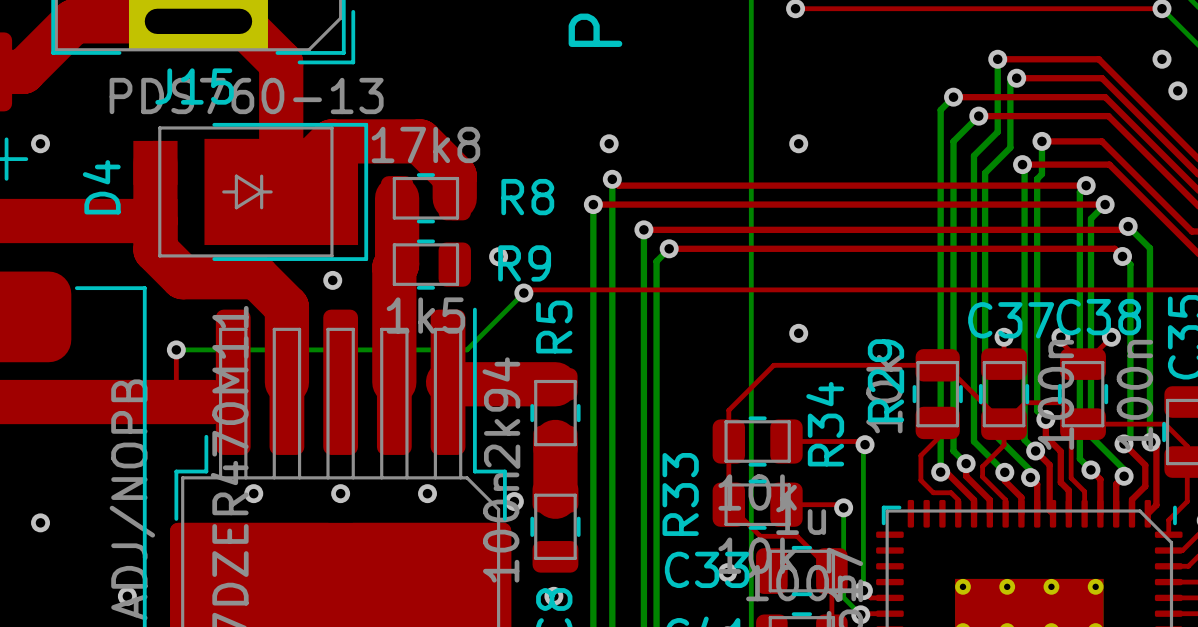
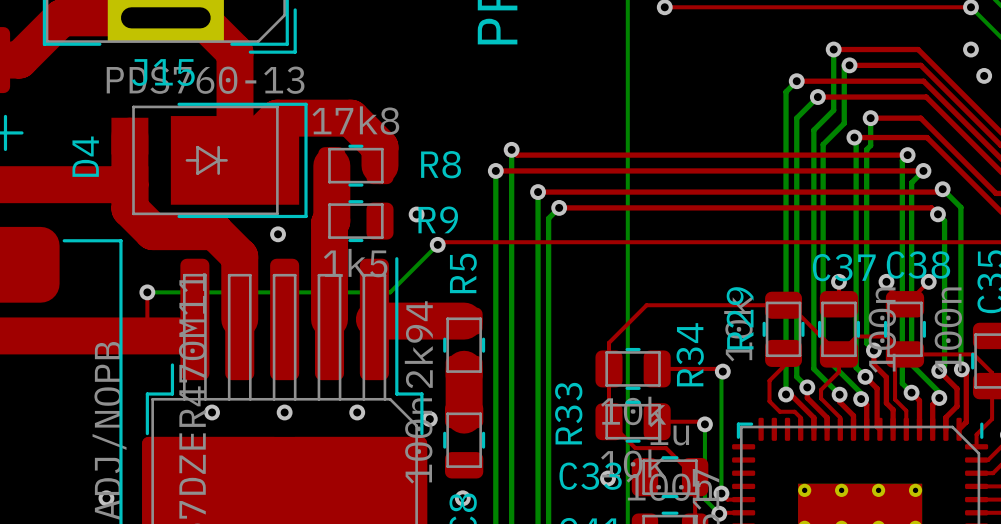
via: (40, 143) -> none
via: (609, 143) -> none
via: (798, 143) -> none
via: (798, 333) -> none
via: (40, 522) -> none

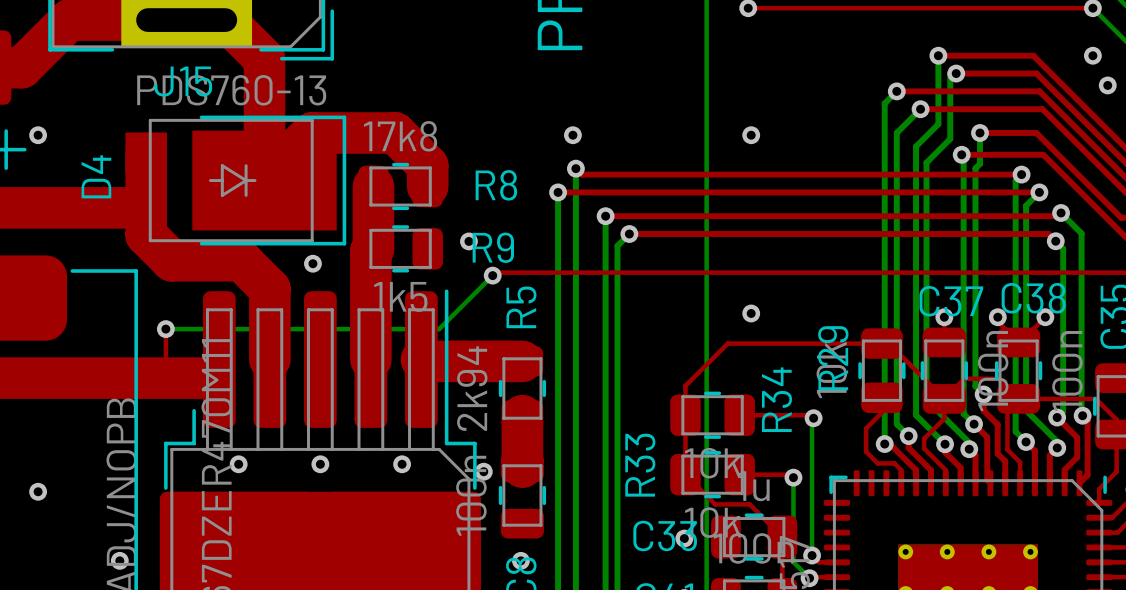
via: none -> (38, 135)
via: none -> (572, 135)
via: none -> (751, 135)
via: none -> (751, 313)
via: none -> (38, 491)

